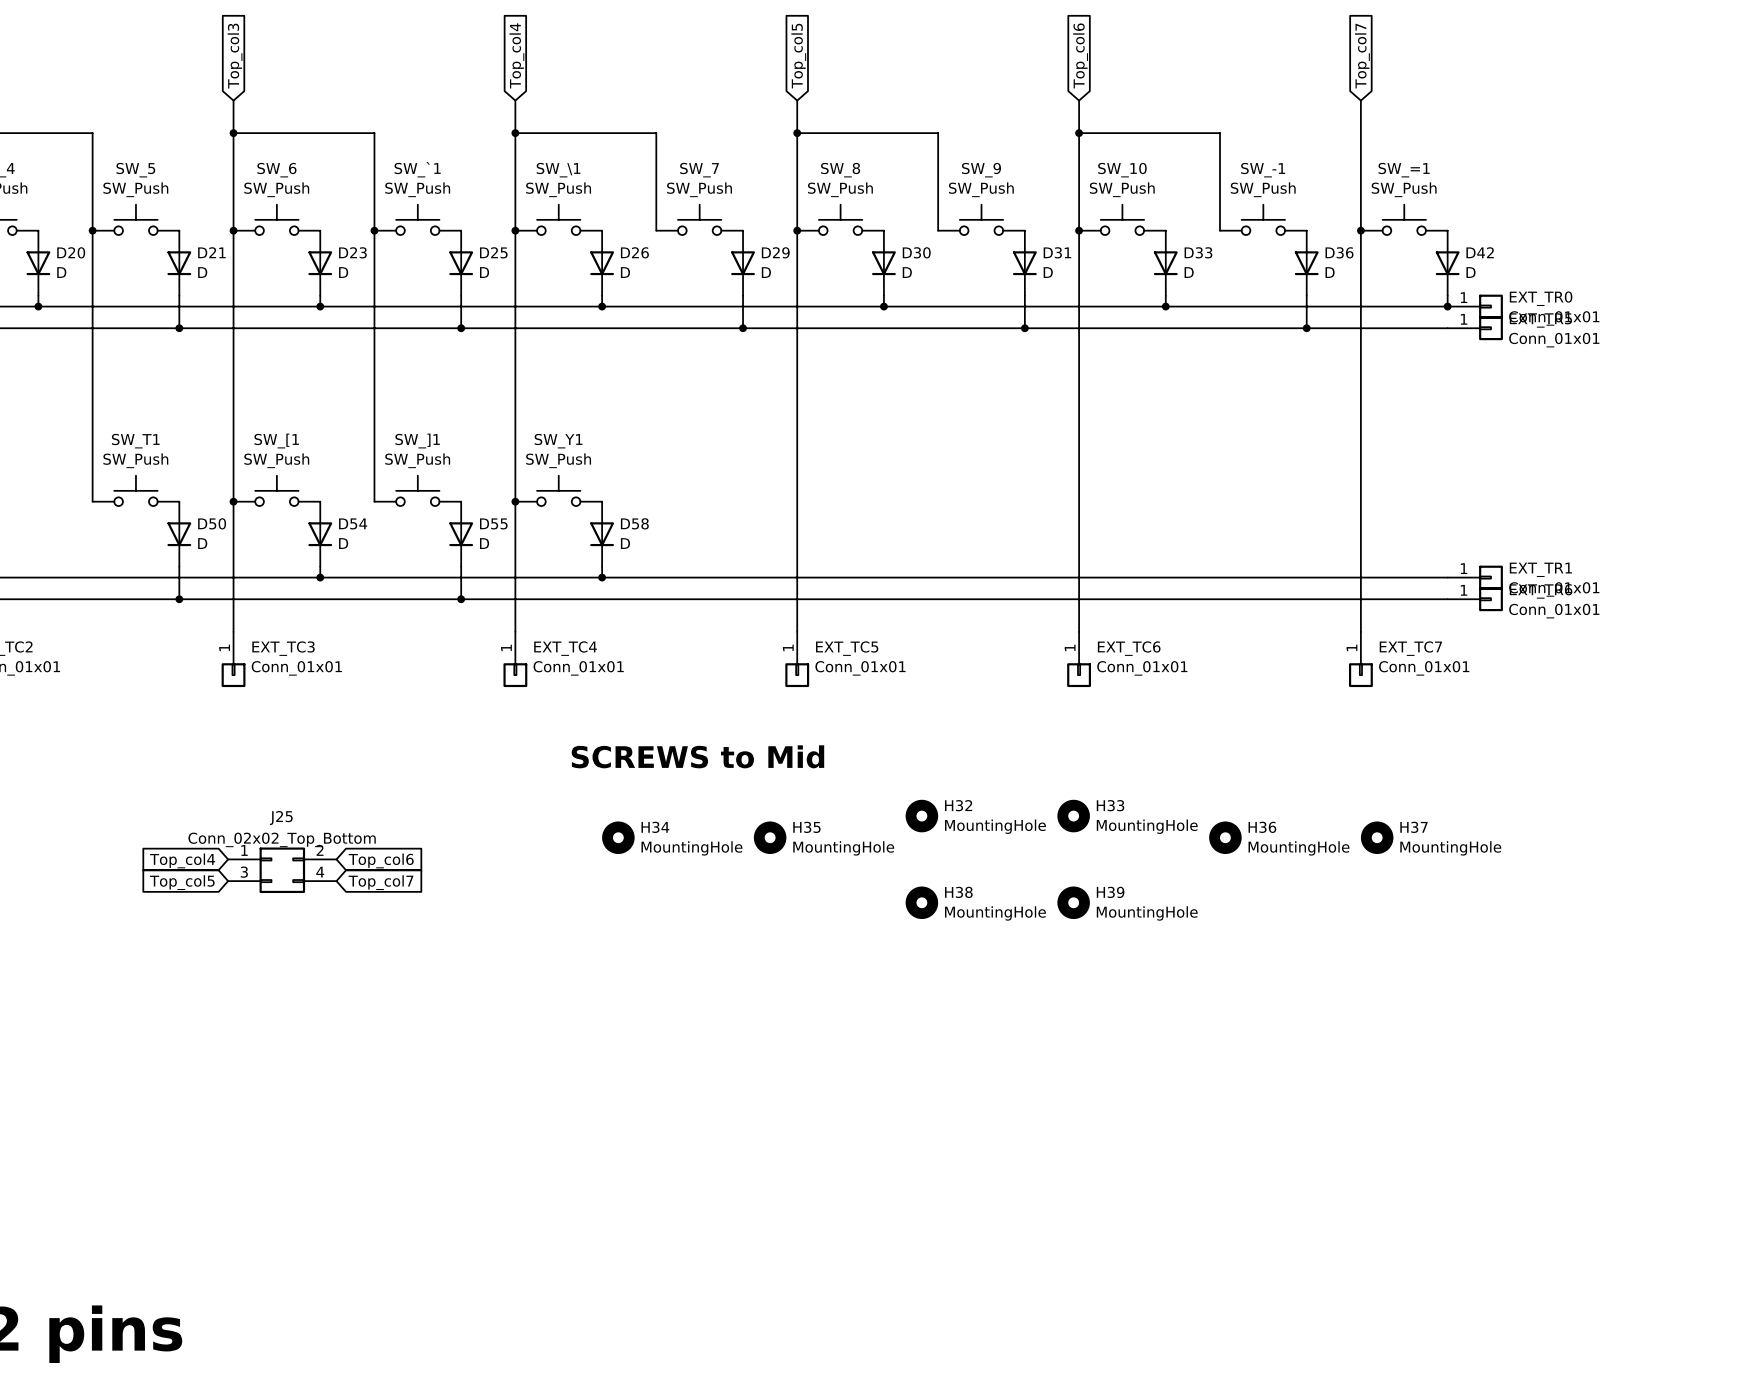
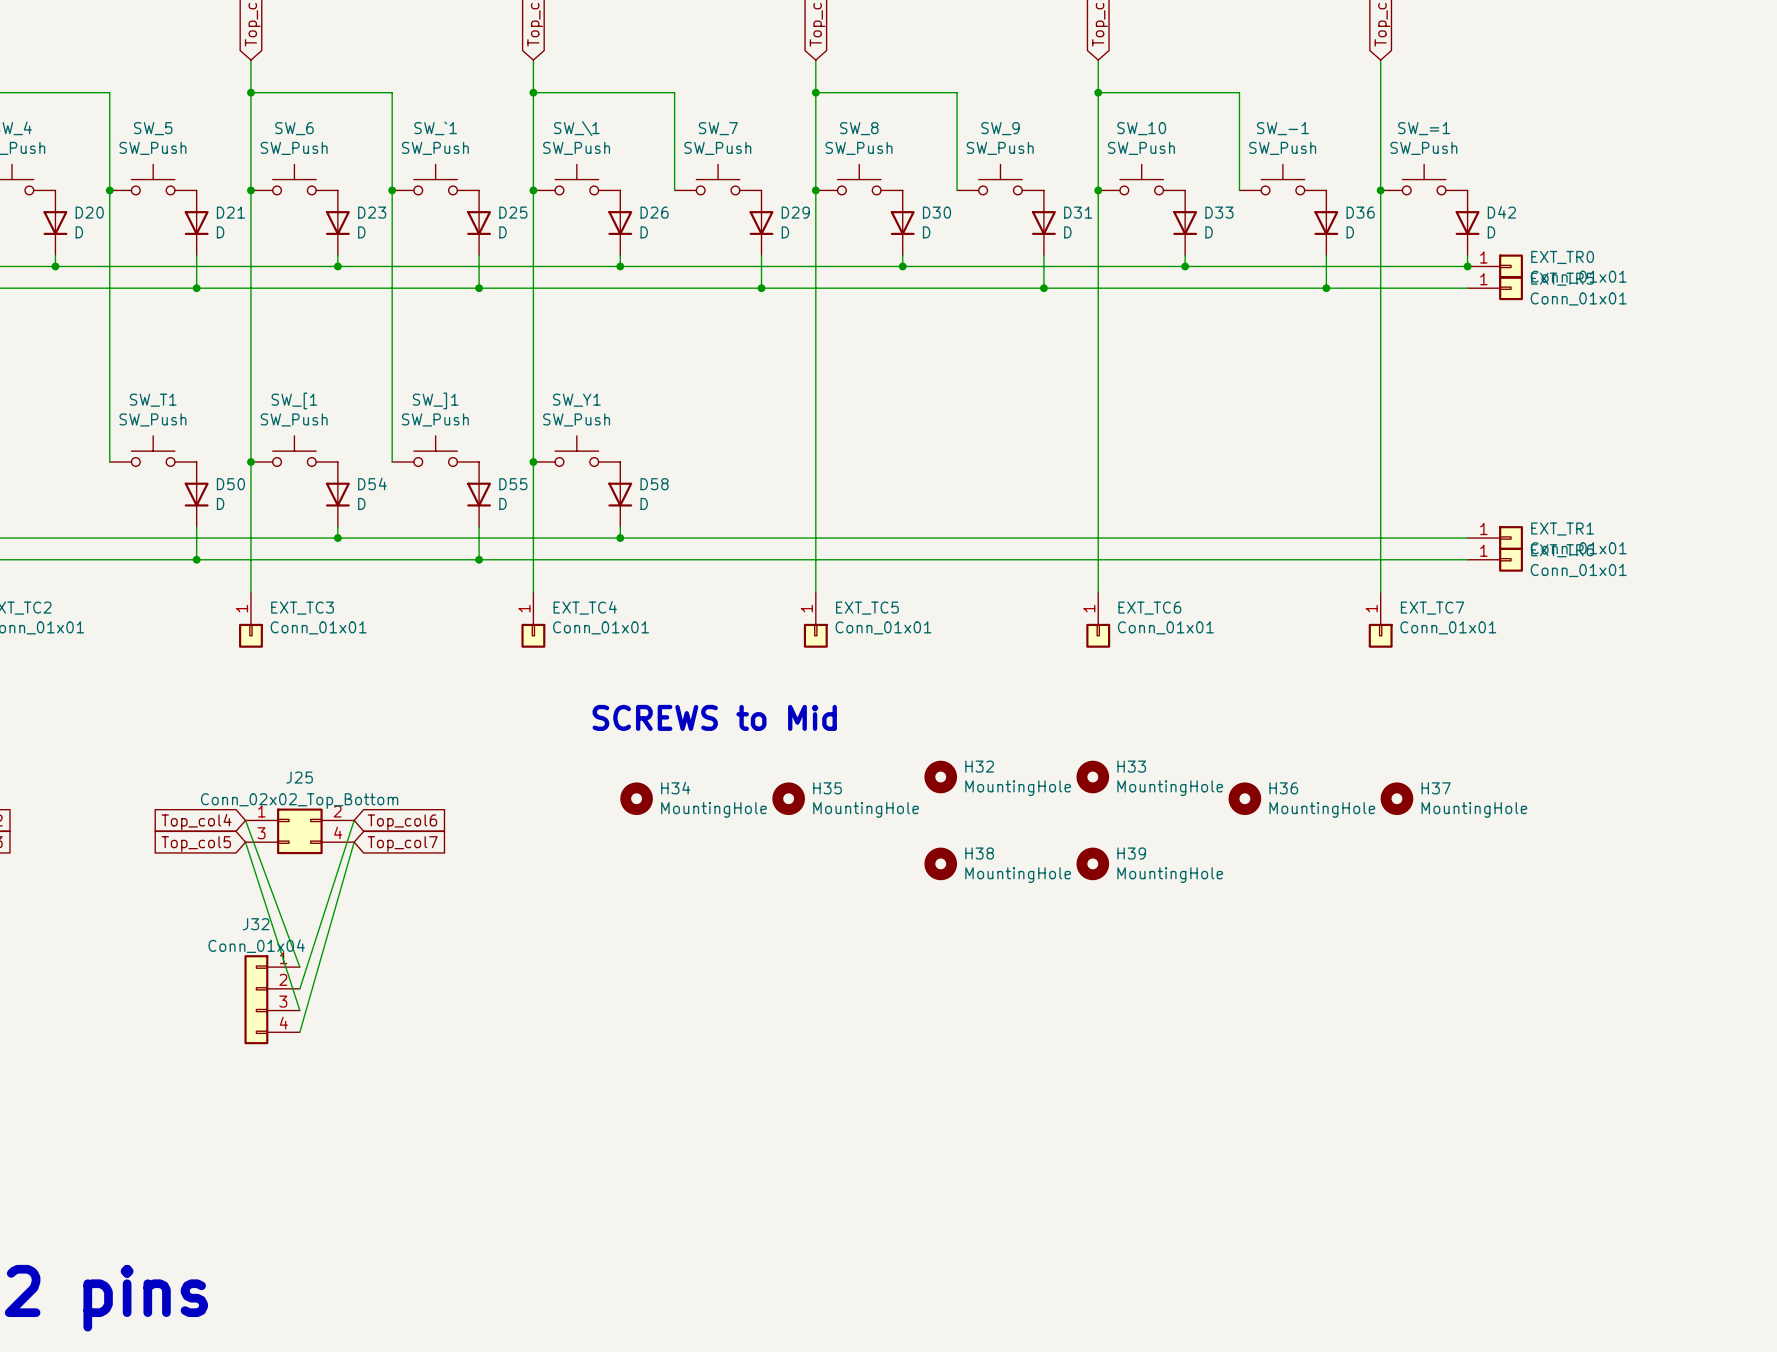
wire: none -> (245, 820) (299, 967)
wire: none -> (354, 820) (299, 988)
wire: none -> (245, 842) (299, 1010)
wire: none -> (354, 842) (299, 1032)
J32: none -> Conn_01x04 (272, 999)

